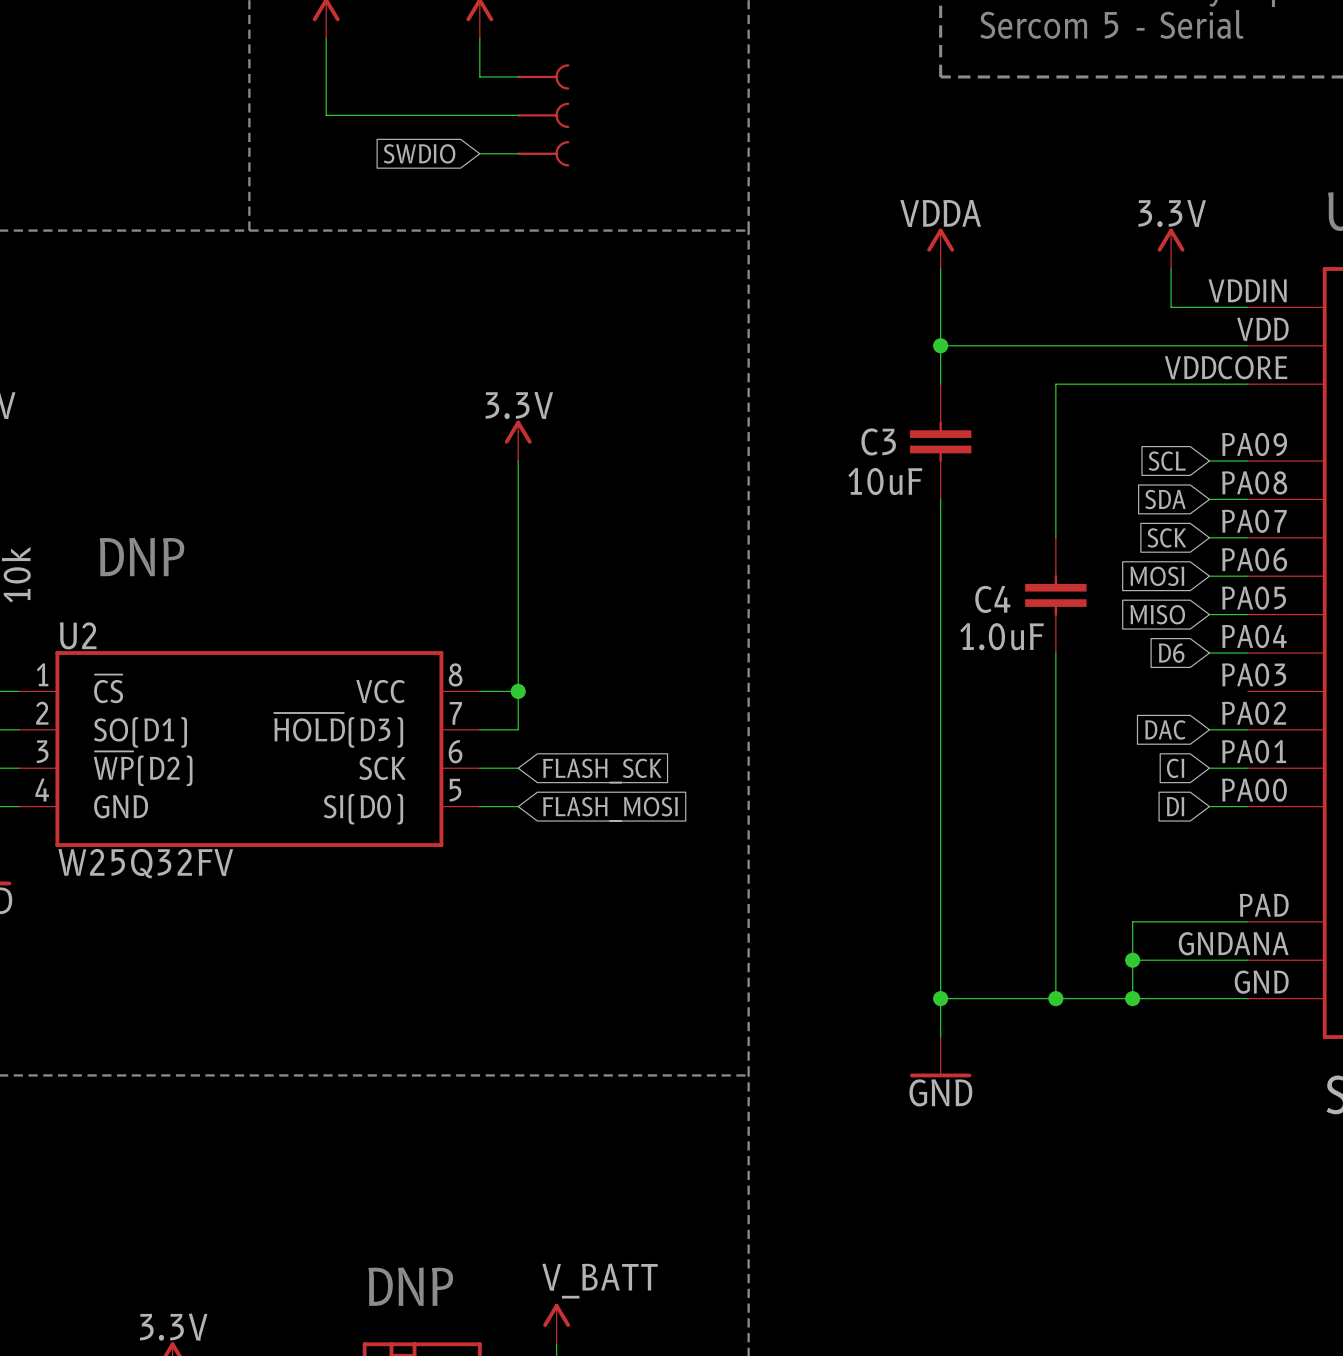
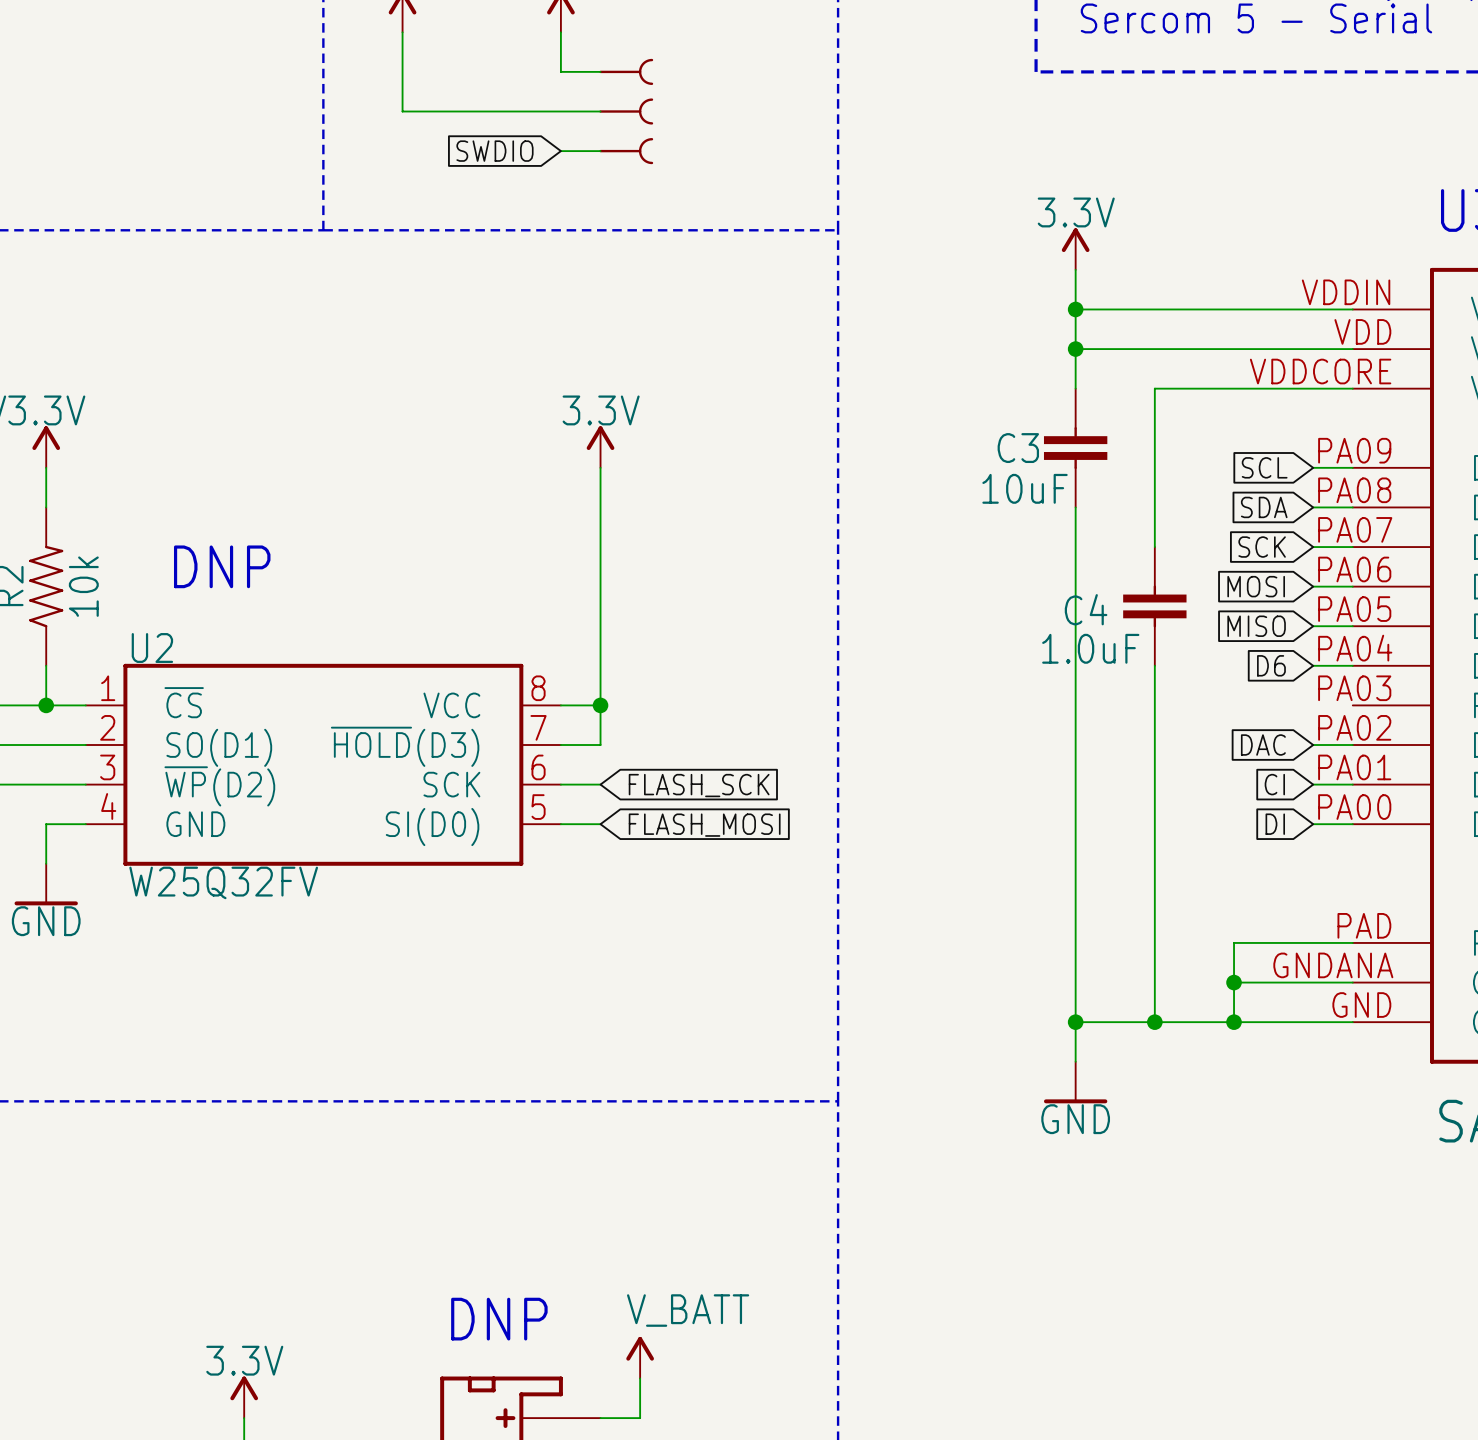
power symbol: VDDA (940, 248) -> none
power symbol position: 3.3V (1171, 248) -> 3.3V (1075, 249)
wire: (940, 268) (940, 384) -> (1075, 269) (1075, 388)
wire: (1171, 268) (1171, 307) -> (1075, 309) (1273, 309)
junction: none -> (1075, 309)
wire: (940, 345) (979, 345) -> none
junction: (940, 345) -> none
junction: none -> (1075, 349)
C3 position: (940, 441) -> (1075, 448)
wire: (940, 499) (940, 1037) -> (1075, 507) (1075, 1061)
wire: (940, 998) (979, 998) -> none
junction position: (940, 998) -> (1075, 1022)
power symbol position: GND (940, 1057) -> GND (1075, 1082)

